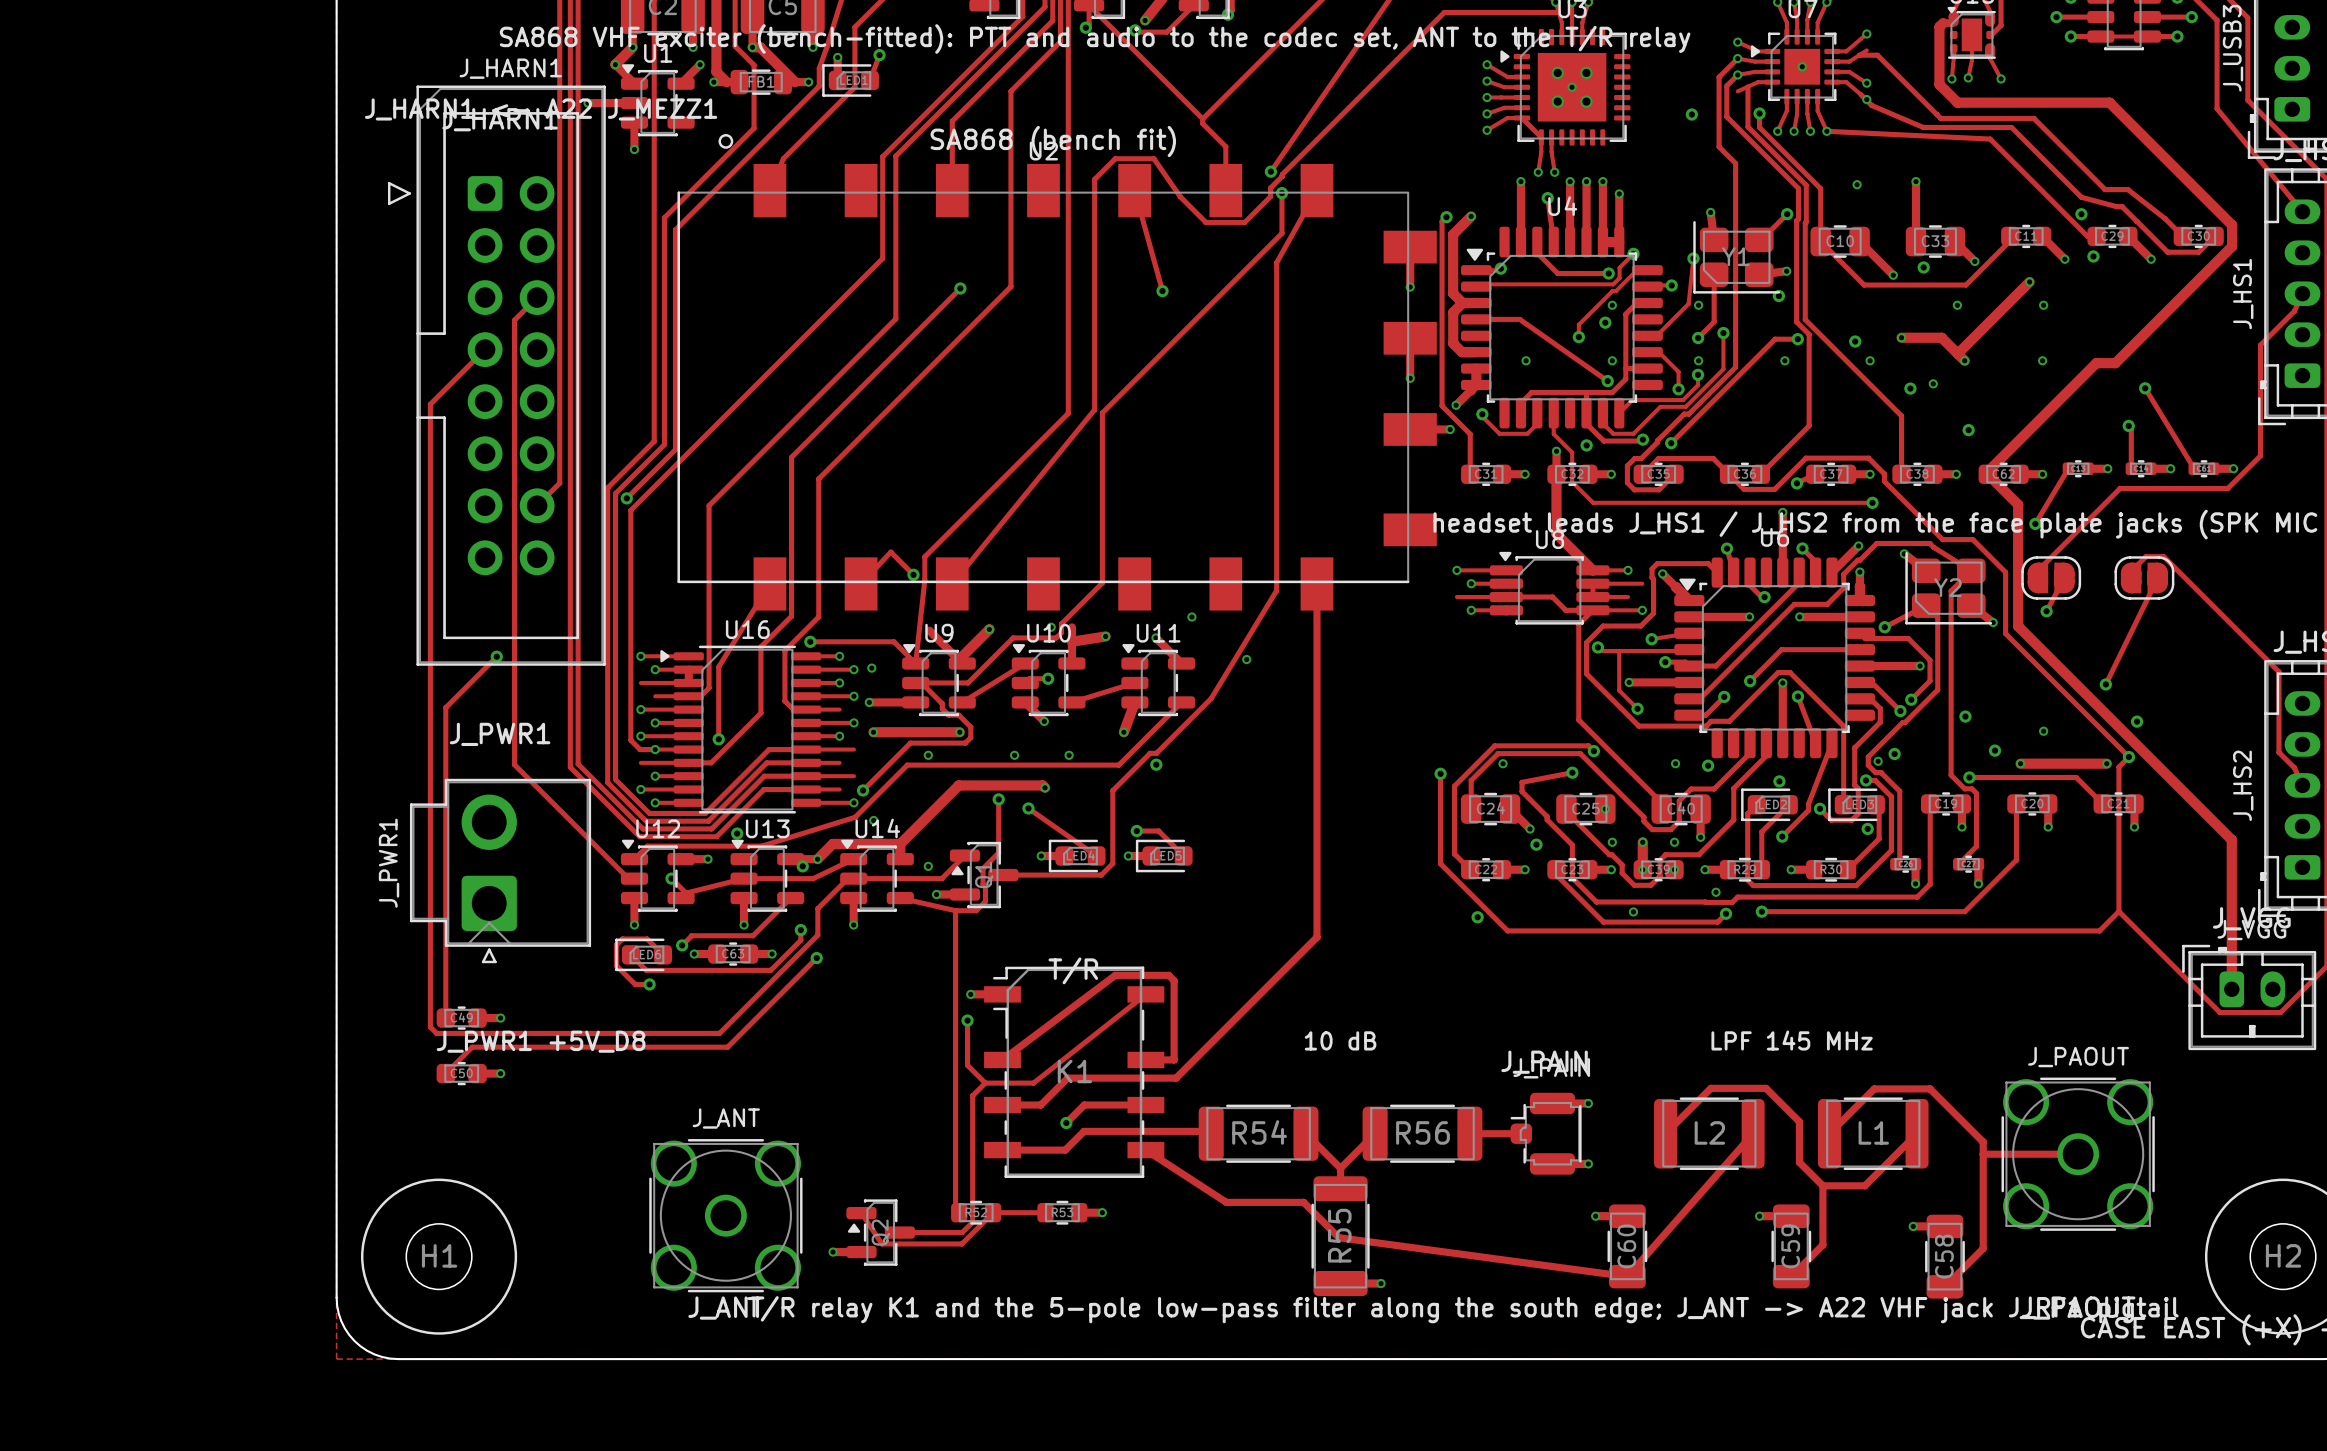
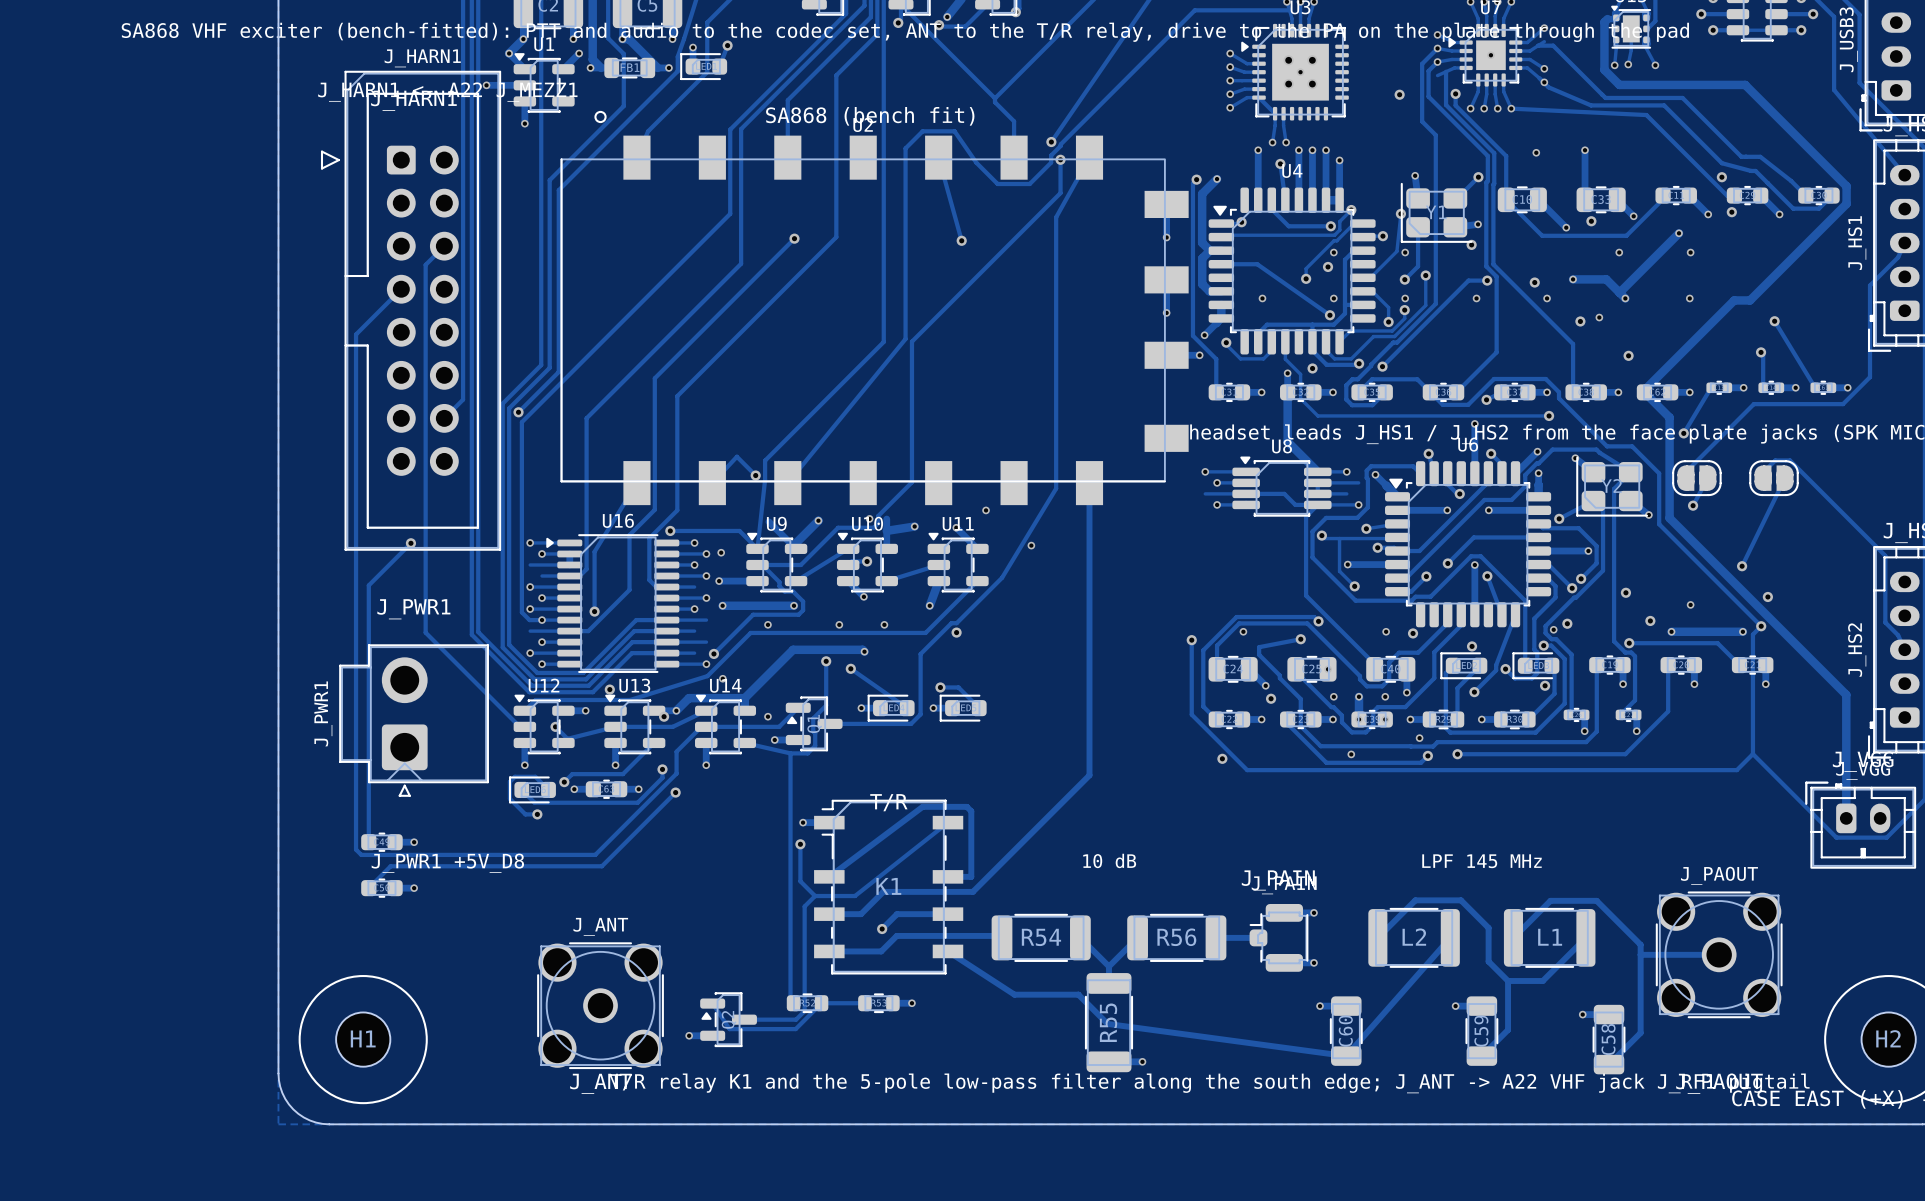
text: SA868 VHF exciter (bench-fitted): PTT and audio to the codec set, ANT to the T/R relay (1095, 39) -> SA868 VHF exciter (bench-fitted): PTT and audio to the codec set, ANT to the T/R relay, drive to the PA on the plate through the pad (905, 32)

